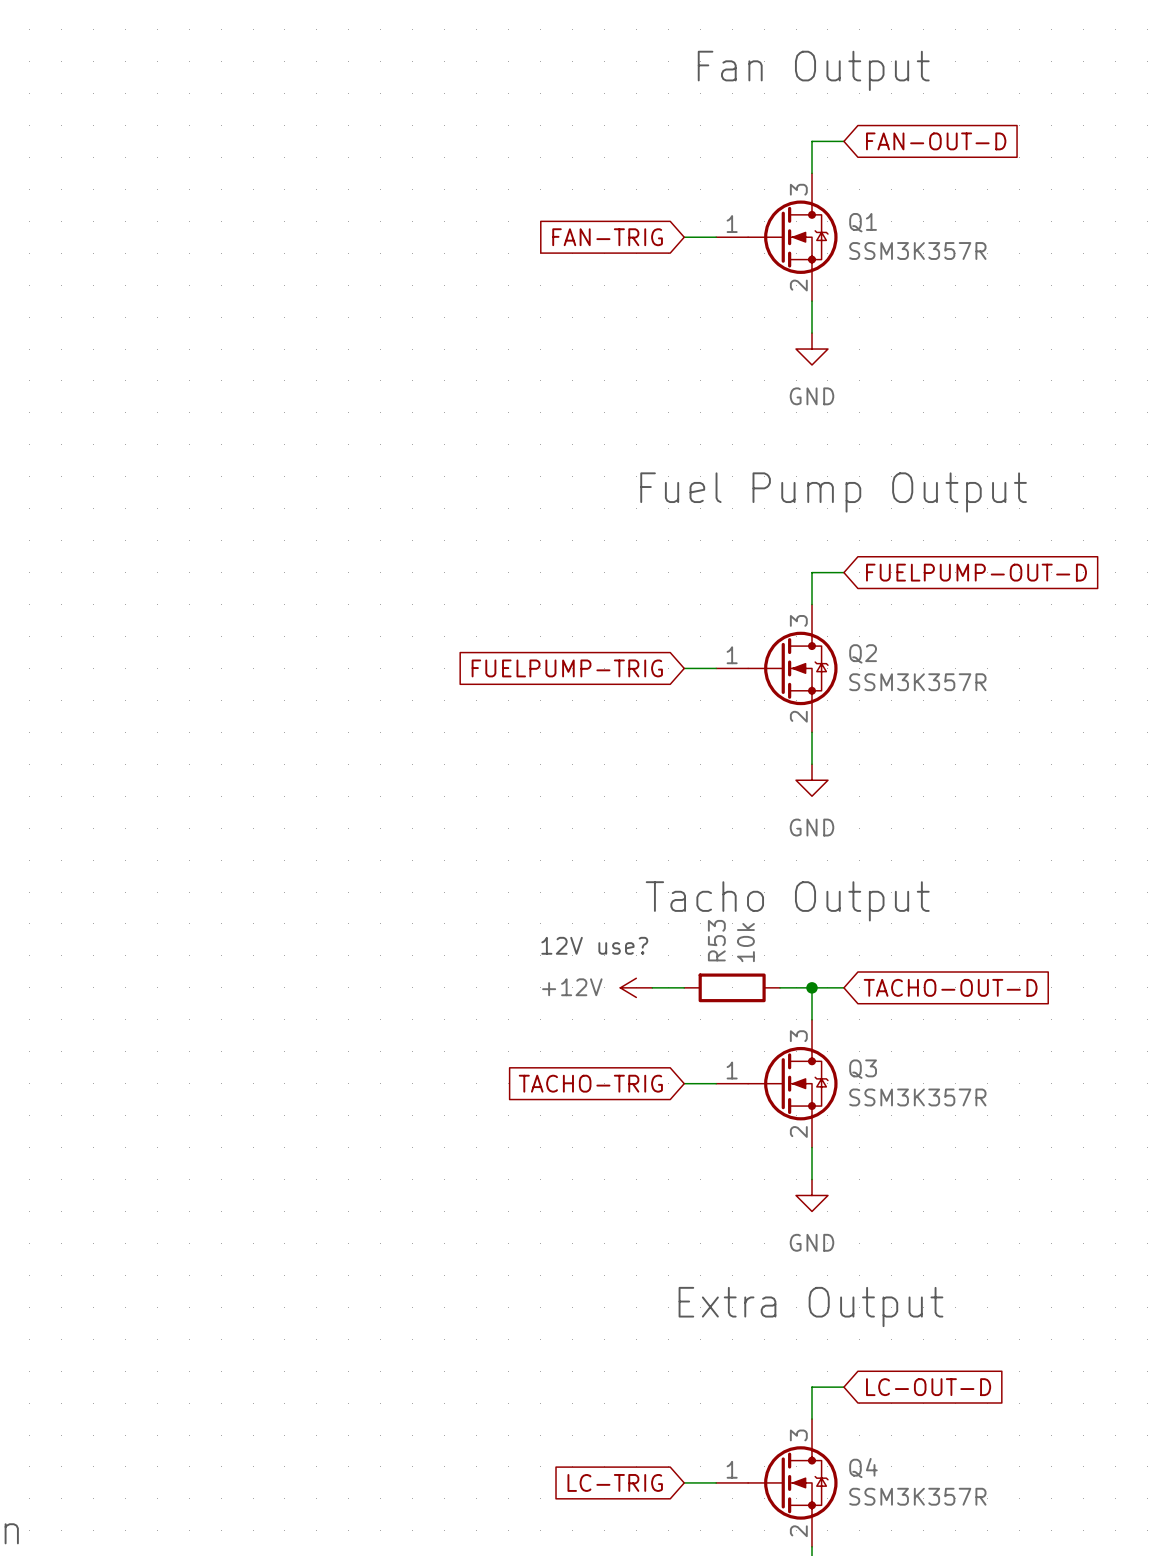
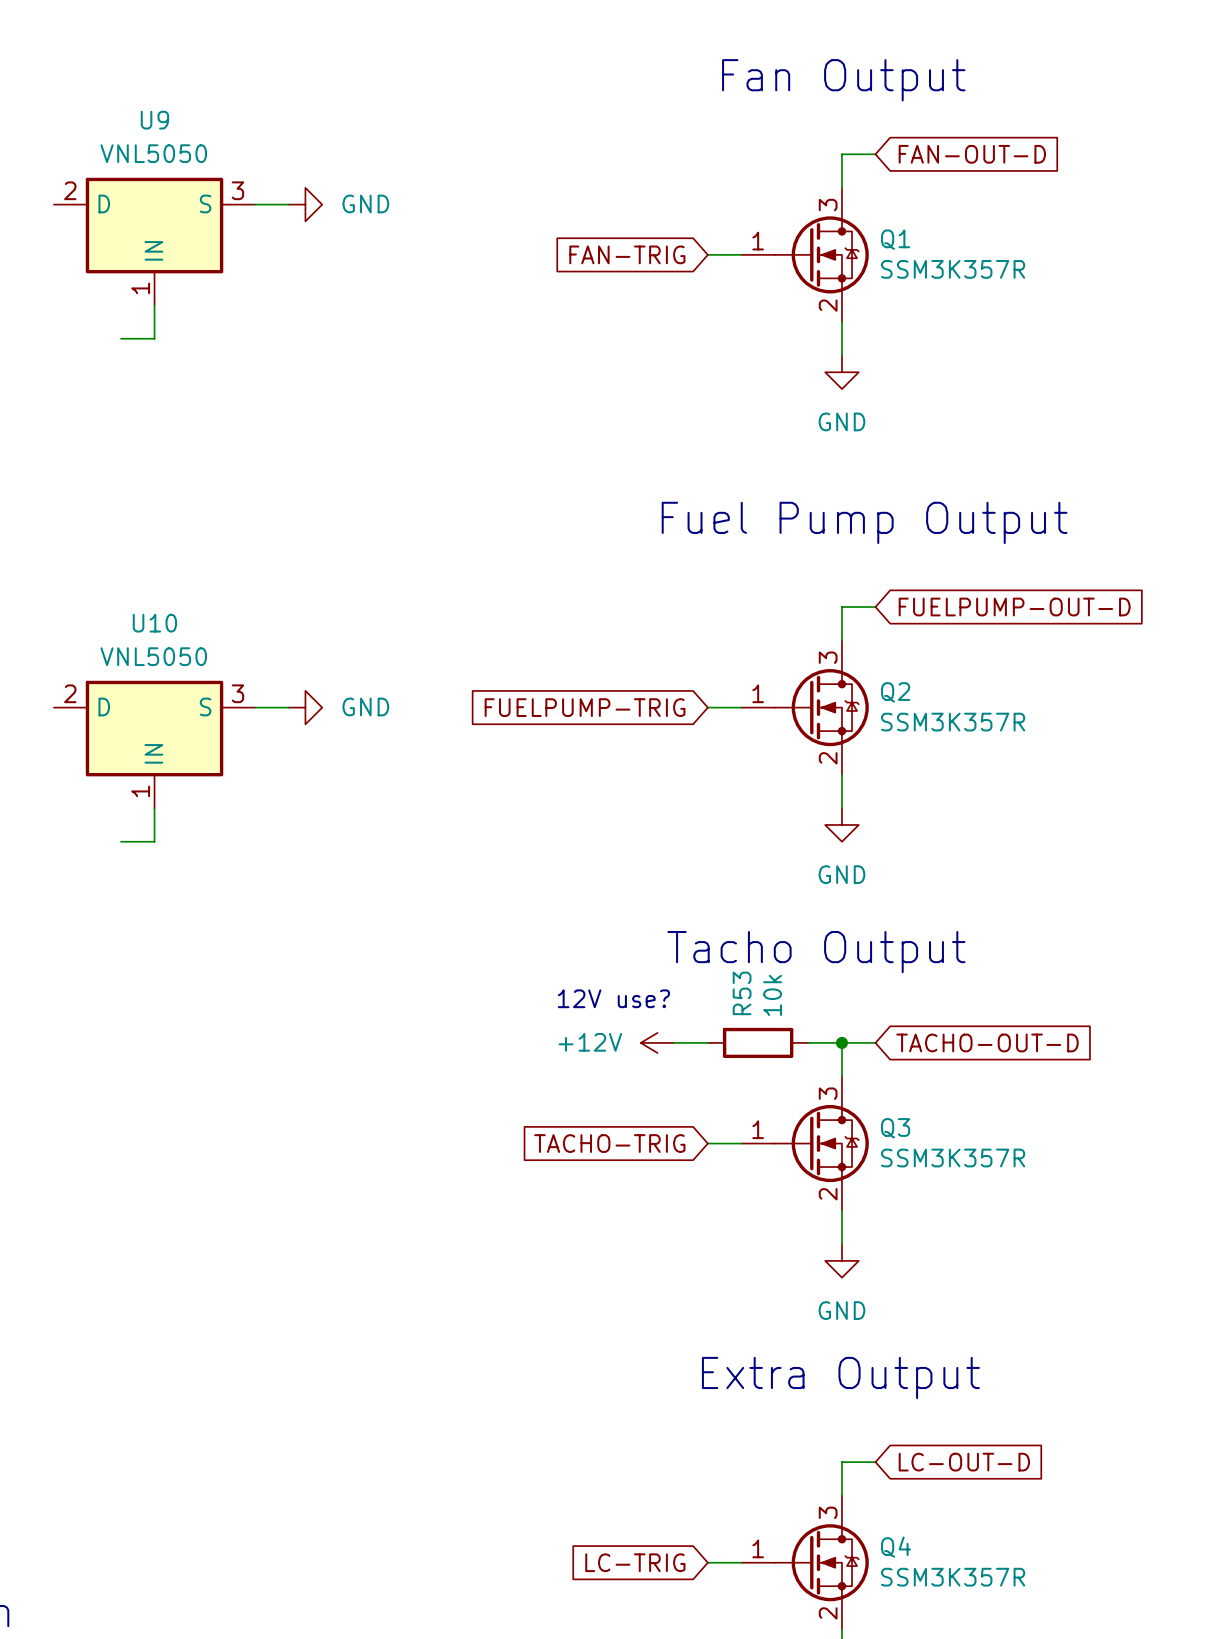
wire: none -> (255, 204) (288, 204)
power symbol: none -> GND (305, 204)
U9: none -> VNL5050 (154, 241)
wire: none -> (154, 305) (154, 338) (121, 338)
wire: none -> (255, 707) (288, 707)
power symbol: none -> GND (305, 707)
U10: none -> VNL5050 (154, 744)
wire: none -> (154, 808) (154, 841) (121, 841)

